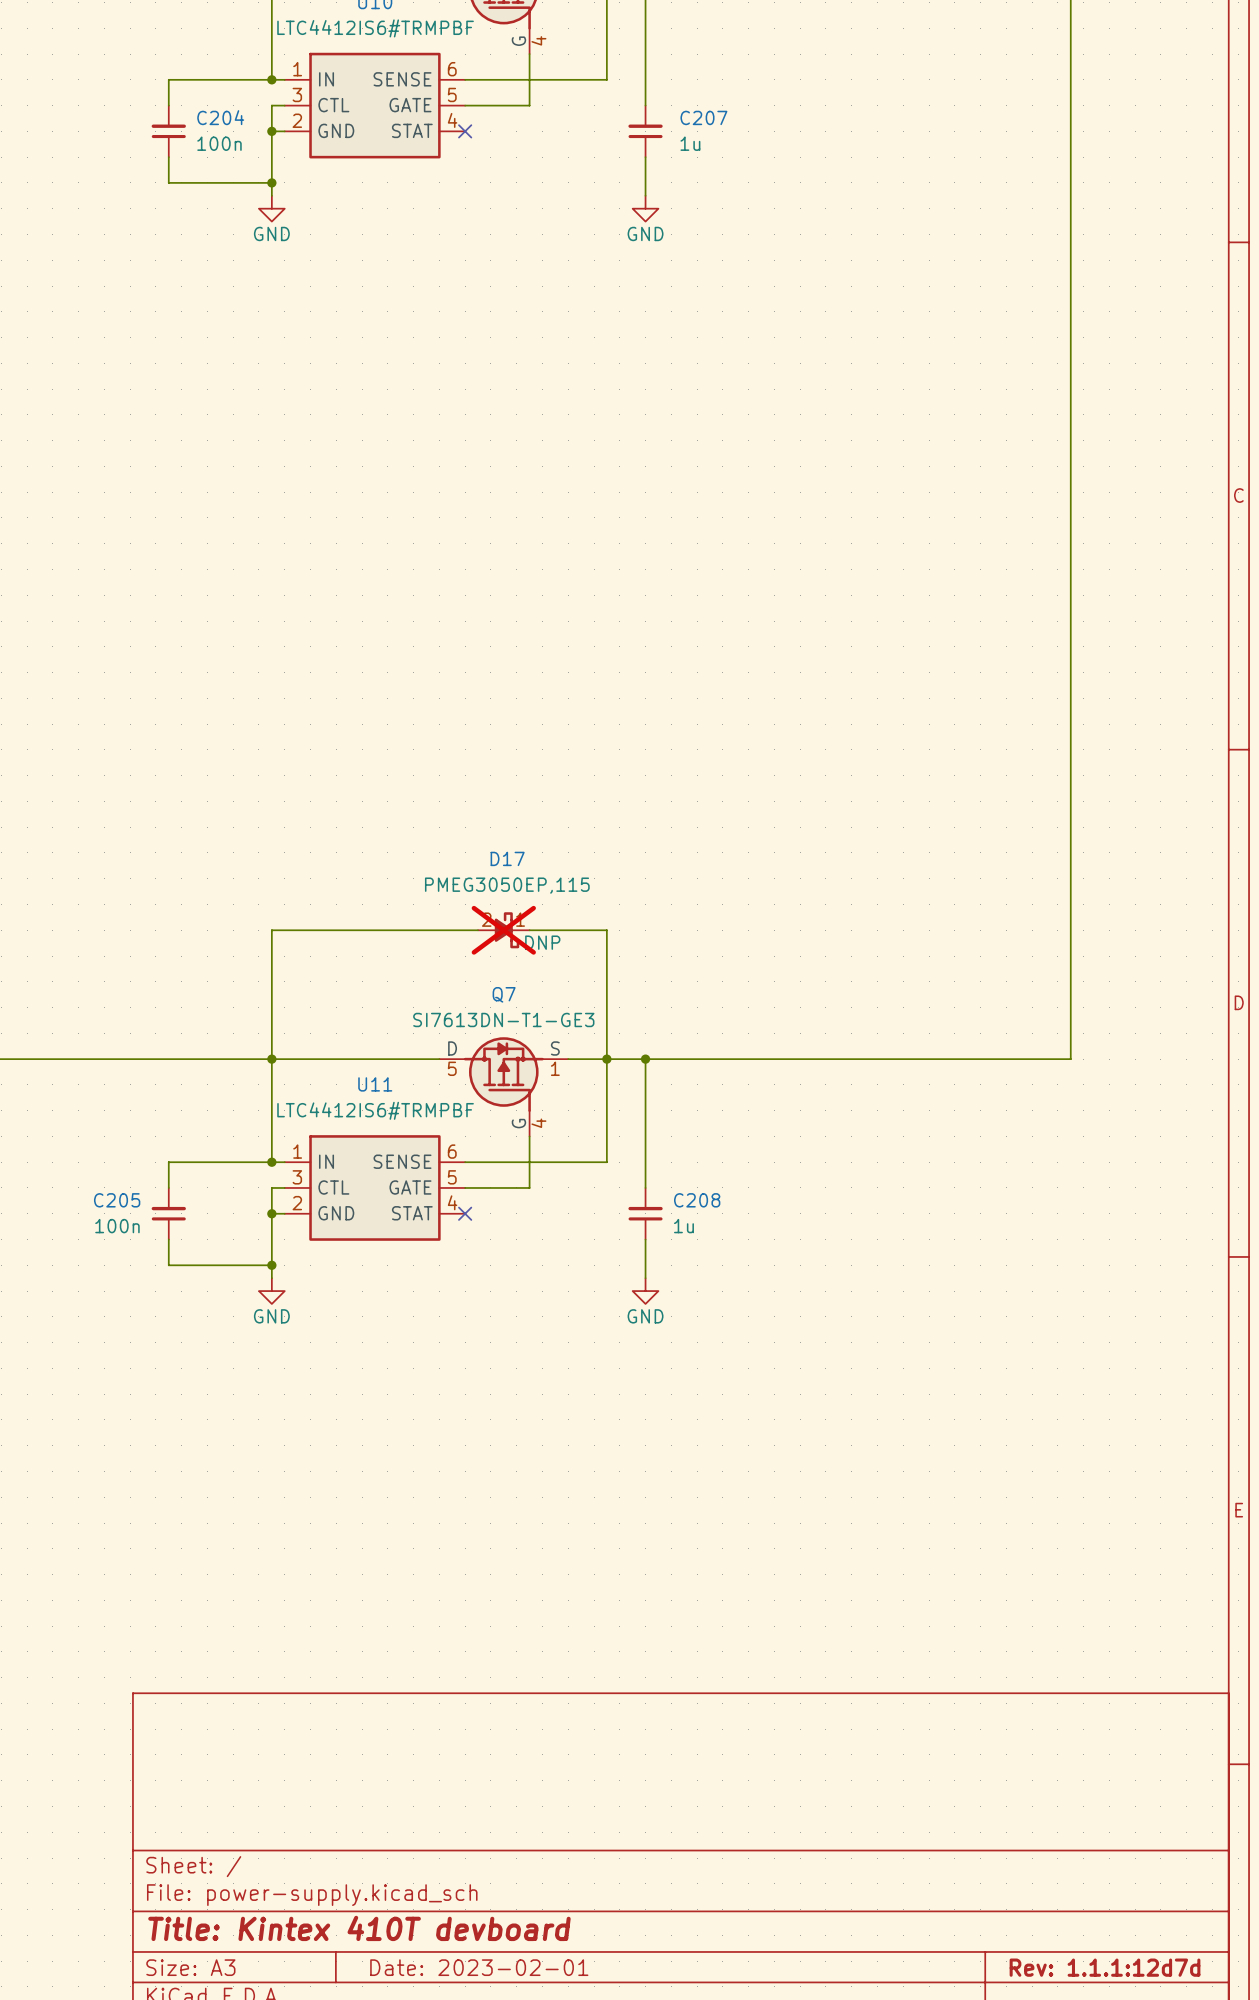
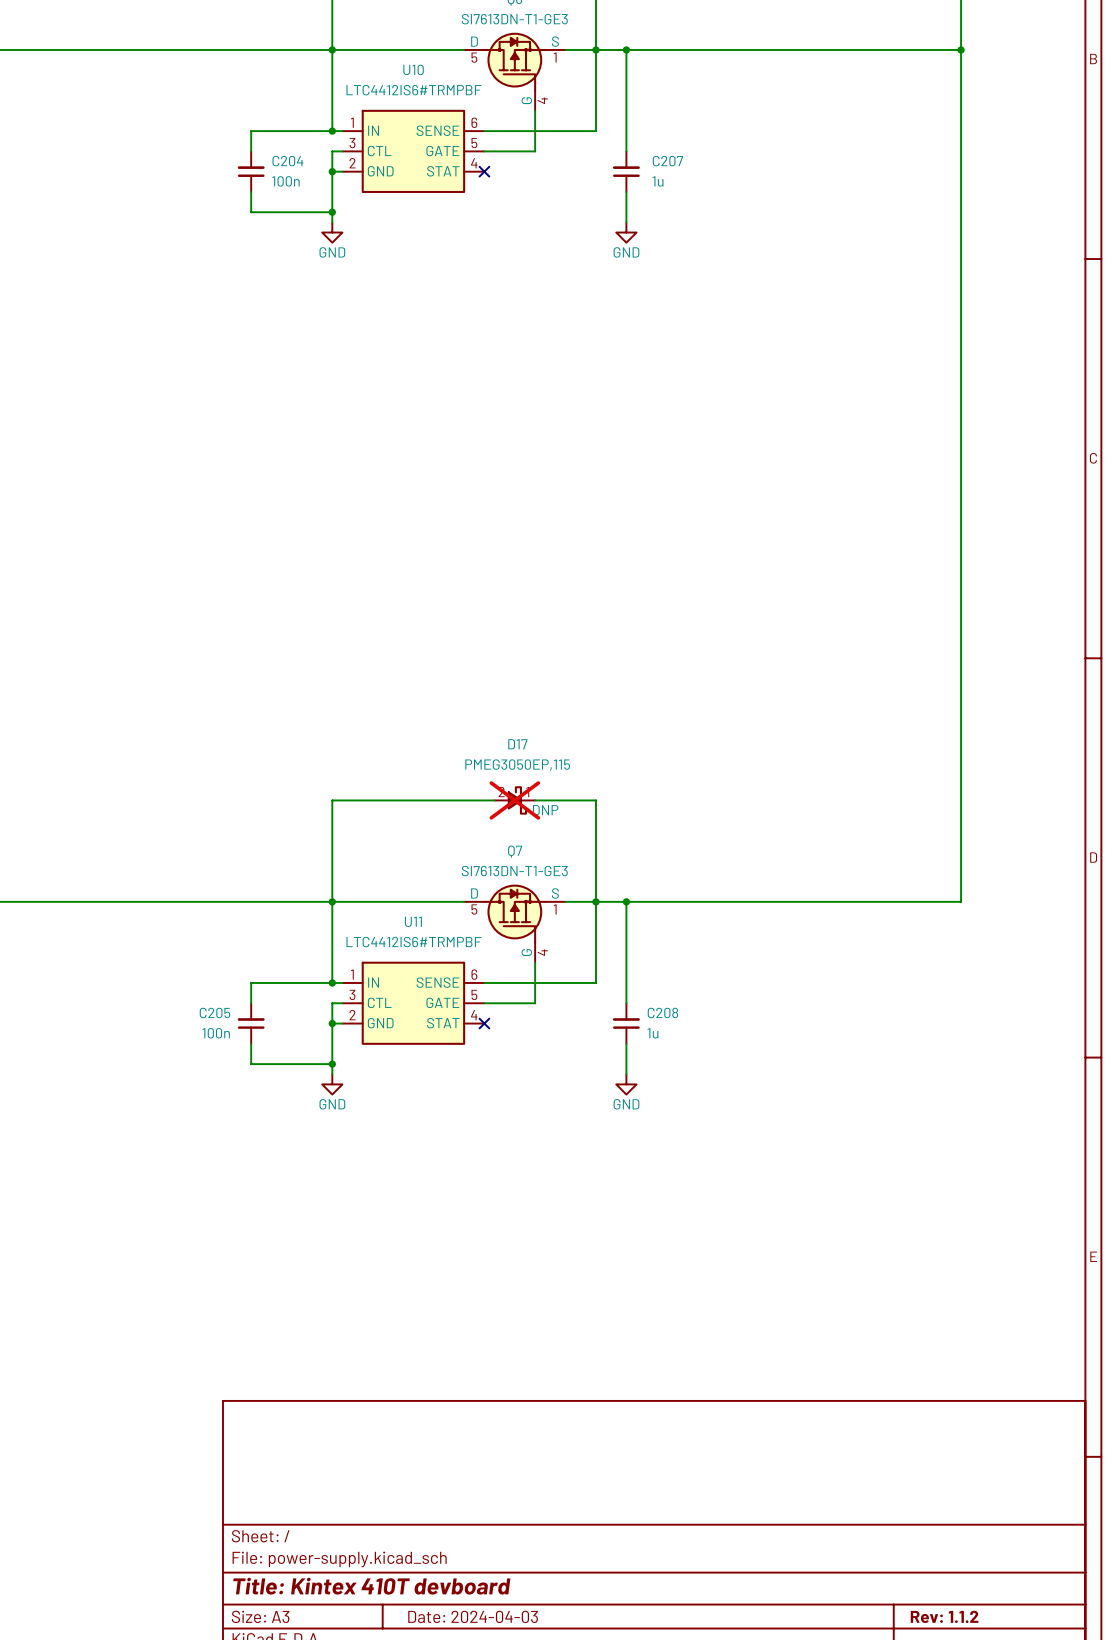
title block: Date: 2023-02-01 (479, 1967) -> Date: 2024-04-03 (473, 1616)
title block: Rev: 1.1.1:12d7d (1105, 1967) -> Rev: 1.1.2 (944, 1616)

